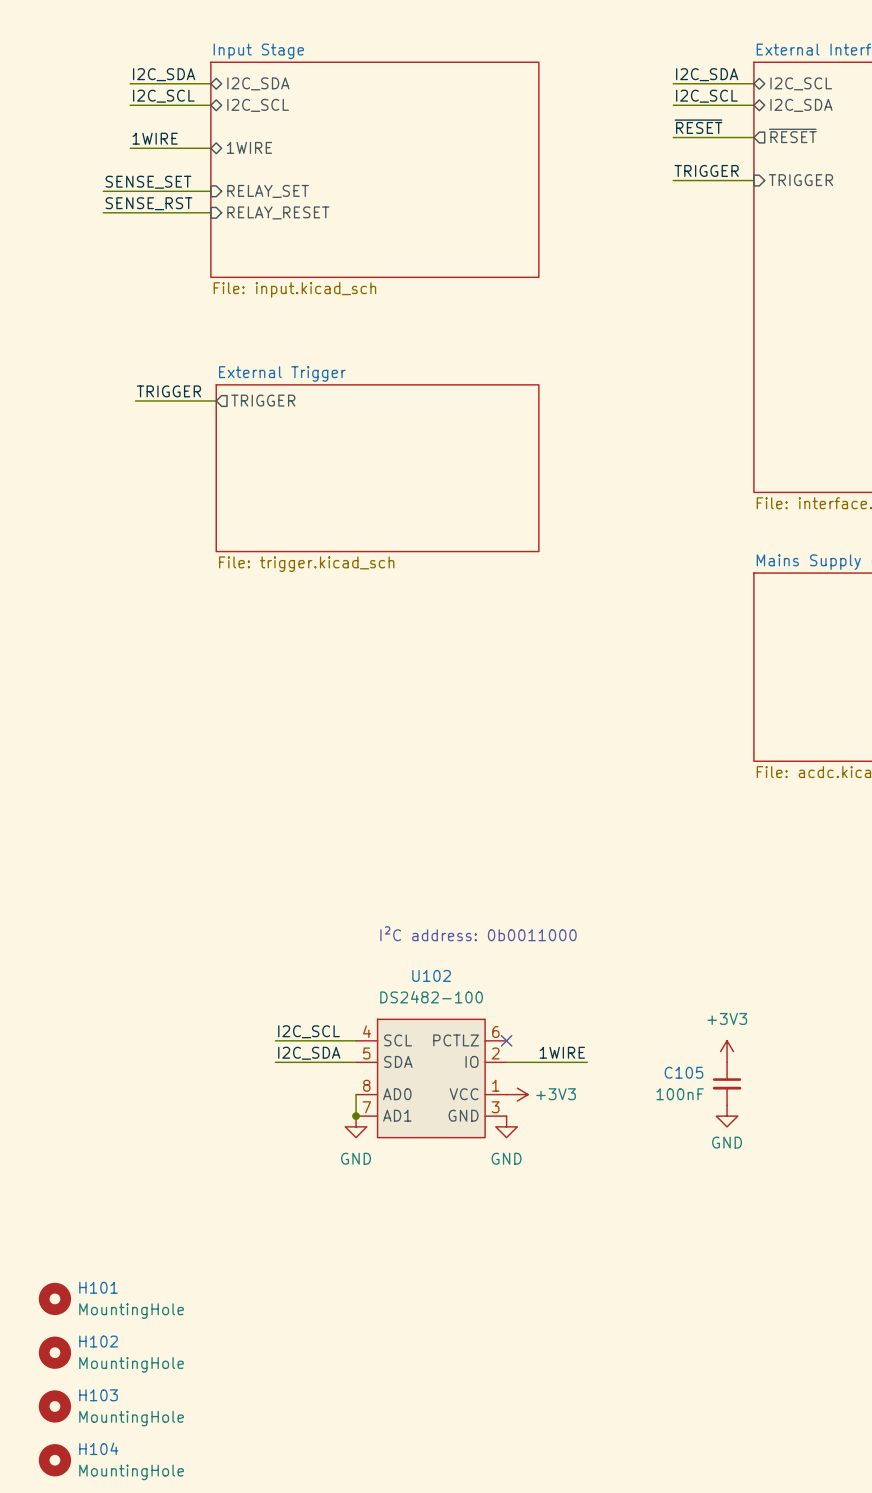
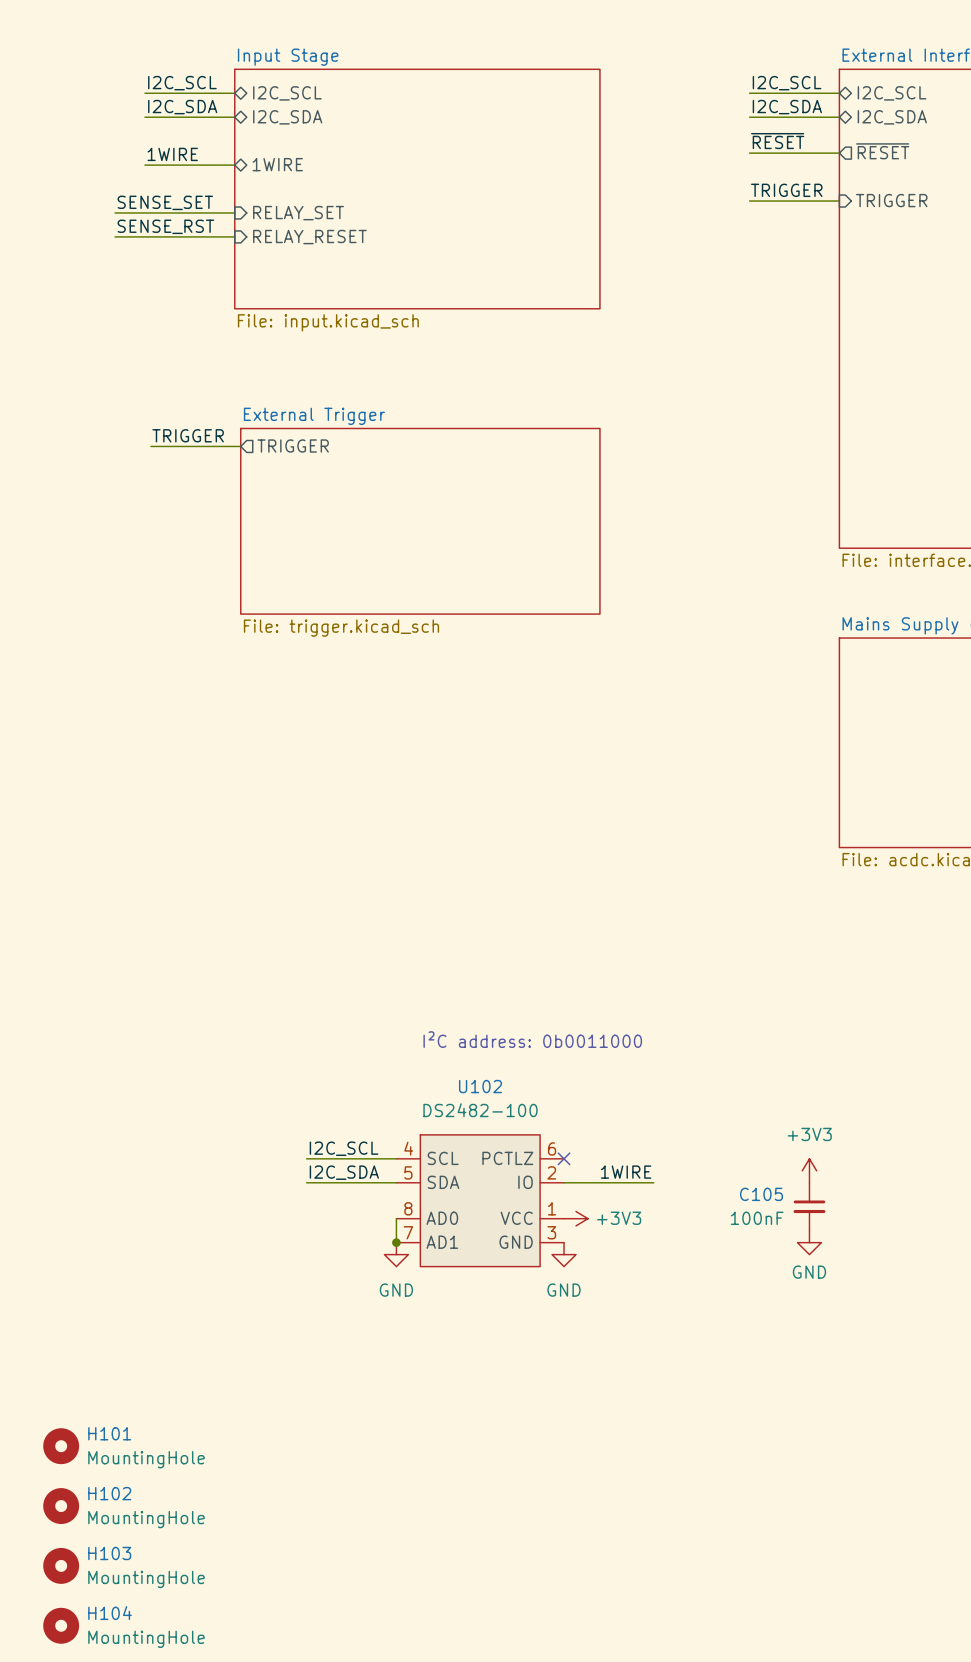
label: I2C_SDA (164, 74) -> I2C_SCL (182, 83)
label: I2C_SDA (707, 74) -> I2C_SCL (787, 83)
sheet pin: I2C_SDA (258, 83) -> I2C_SCL (287, 93)
label: I2C_SCL (163, 96) -> I2C_SDA (182, 107)
label: I2C_SCL (706, 96) -> I2C_SDA (787, 107)
sheet pin: I2C_SCL (258, 105) -> I2C_SDA (287, 117)

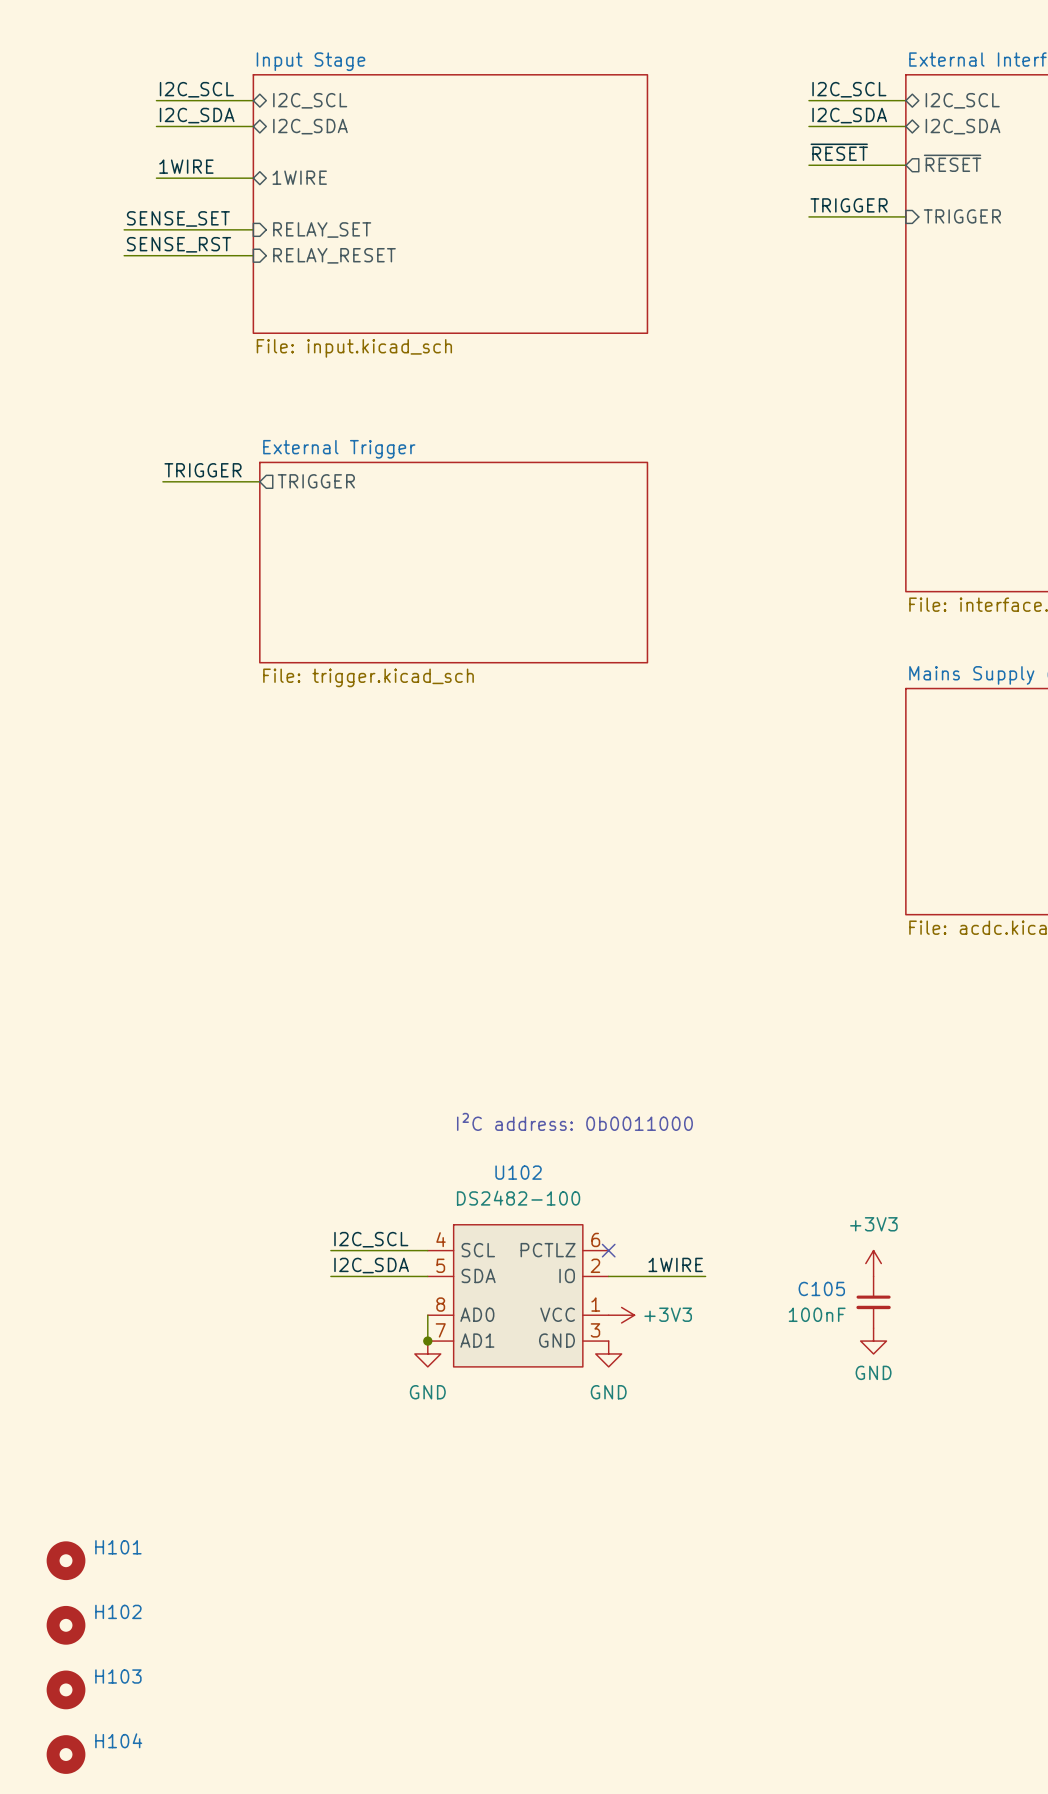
H101 value: MountingHole (146, 1459) -> none
H102 value: MountingHole (146, 1519) -> none
H103 value: MountingHole (146, 1579) -> none
H104 value: MountingHole (146, 1639) -> none

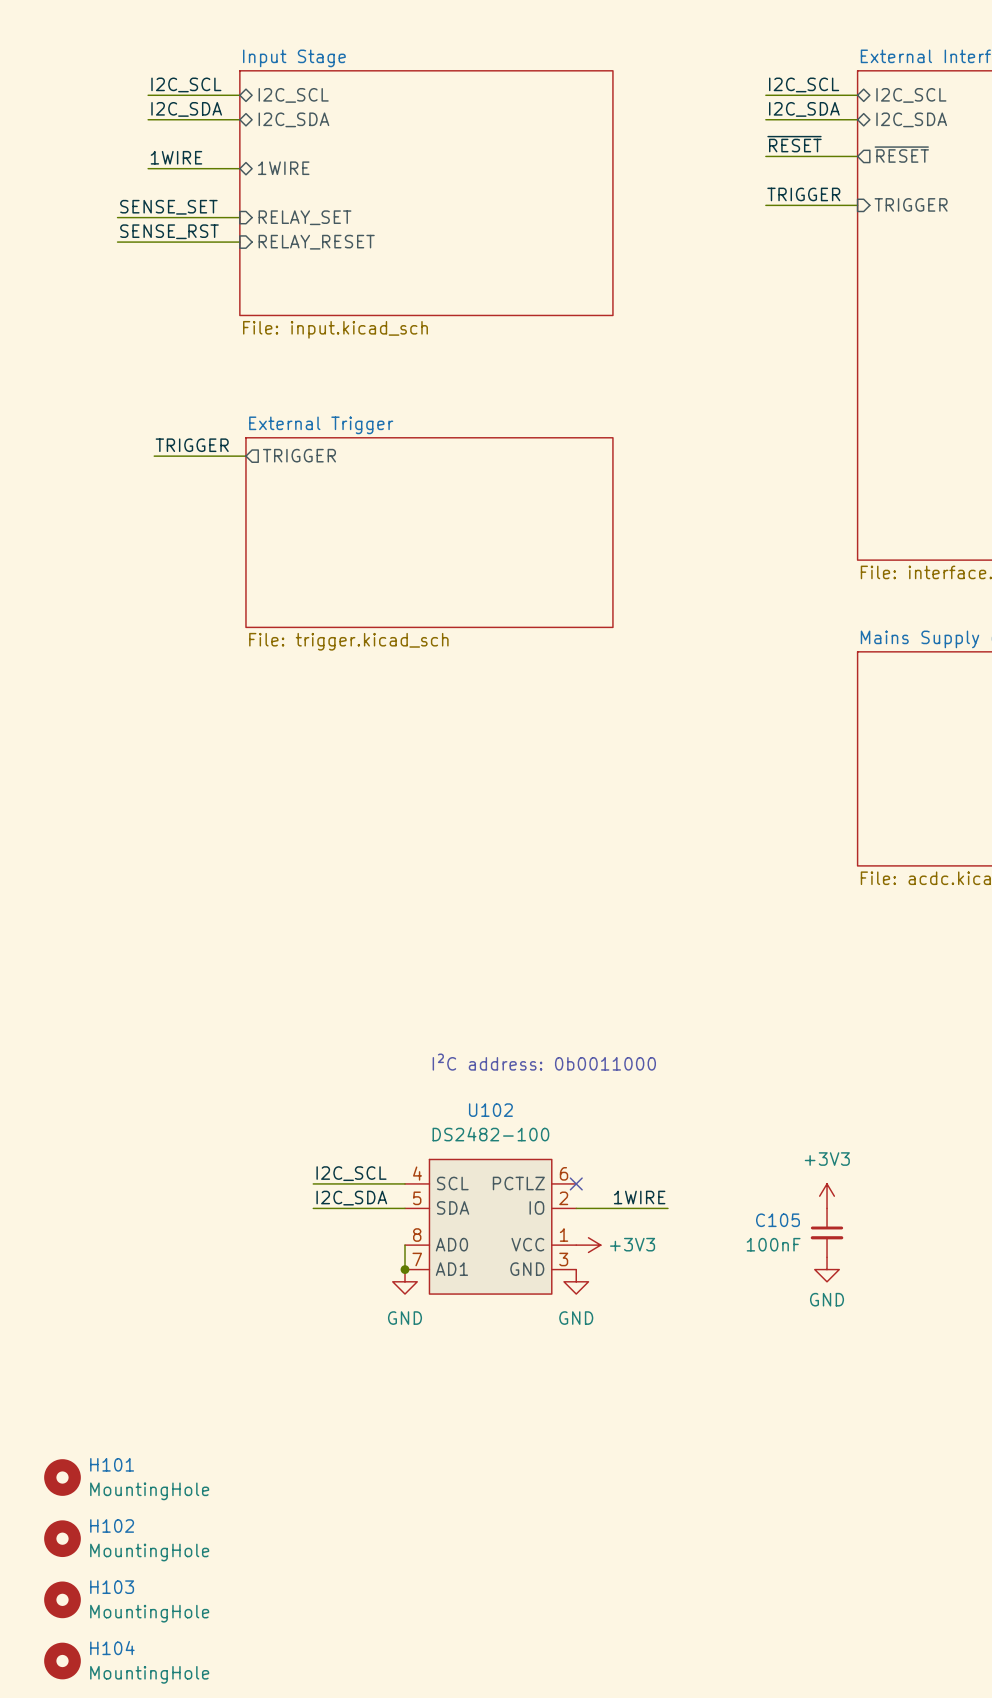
H101 value: none -> MountingHole (149, 1491)
H102 value: none -> MountingHole (149, 1552)
H103 value: none -> MountingHole (149, 1613)
H104 value: none -> MountingHole (149, 1674)

